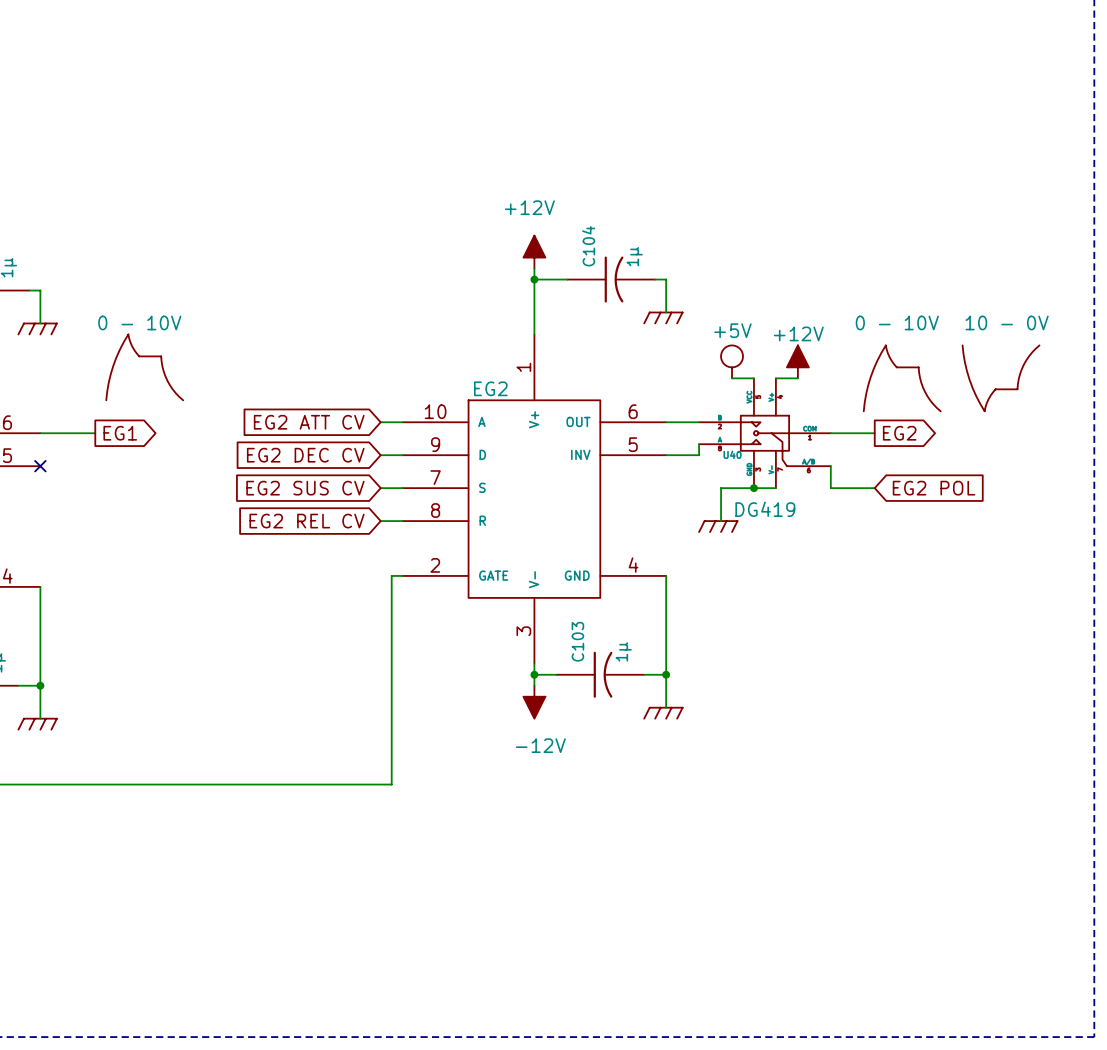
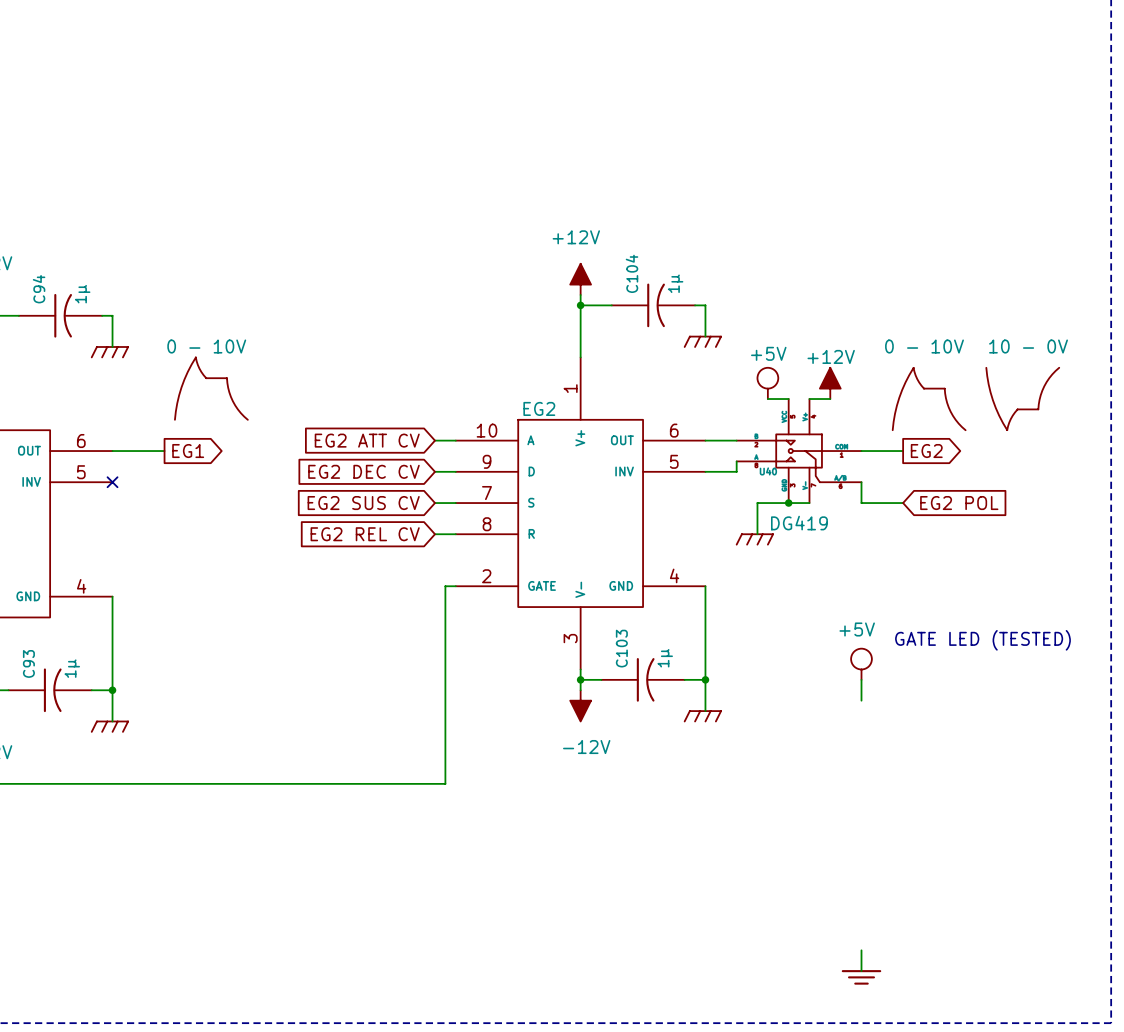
text: none -> GATE LED (TESTED) (982, 640)
power symbol: none -> +5V (861, 664)
wire: none -> (861, 679) (861, 700)
wire: none -> (861, 950) (861, 971)
power symbol: none -> (861, 977)

